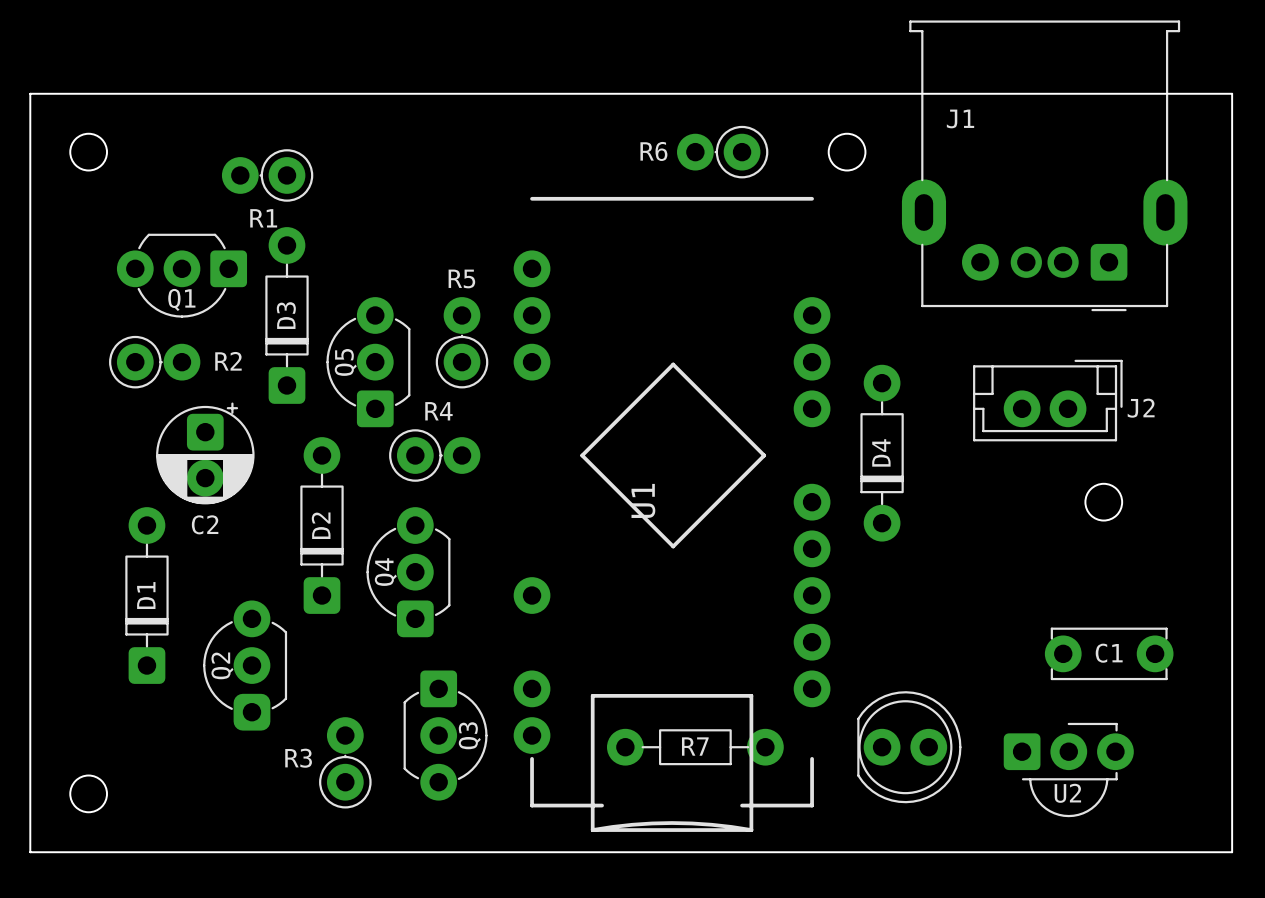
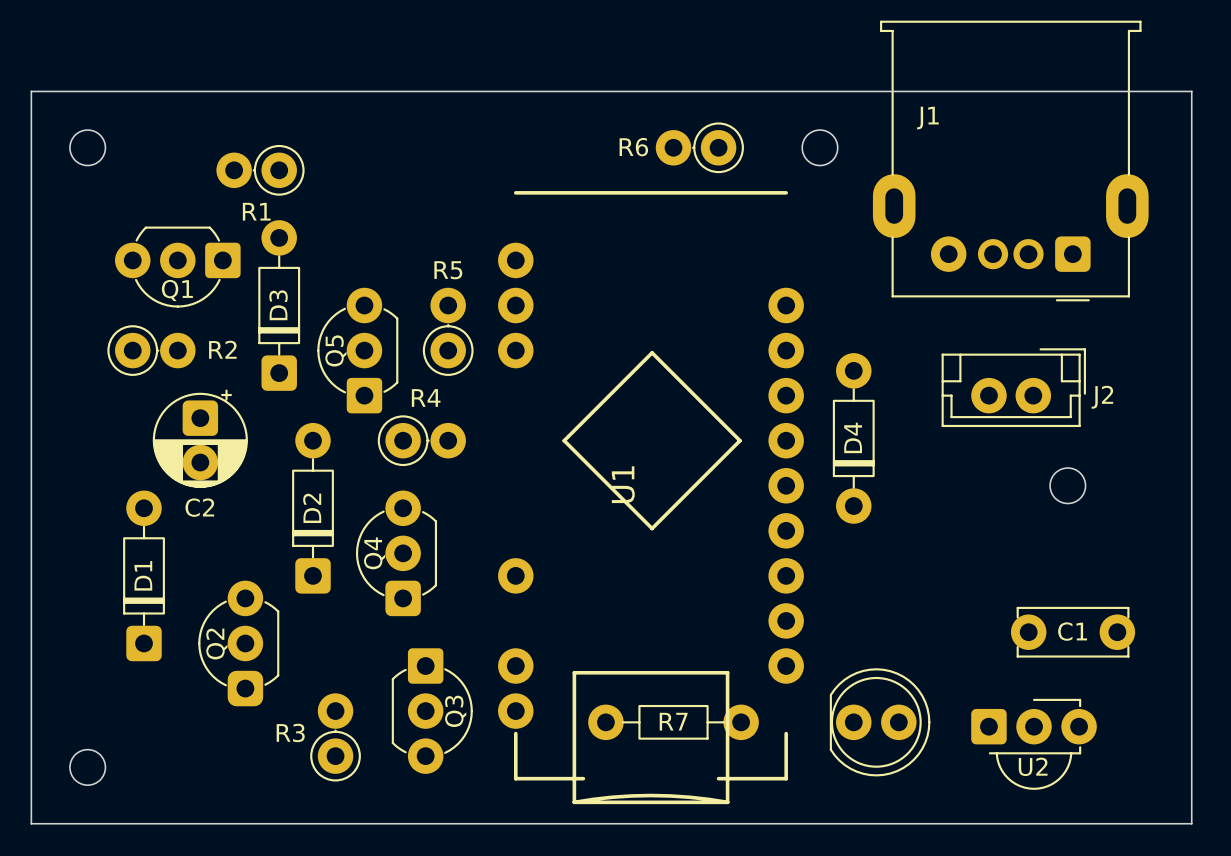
U1 footprint: [513, 196, 831, 832] -> [498, 191, 804, 805]

